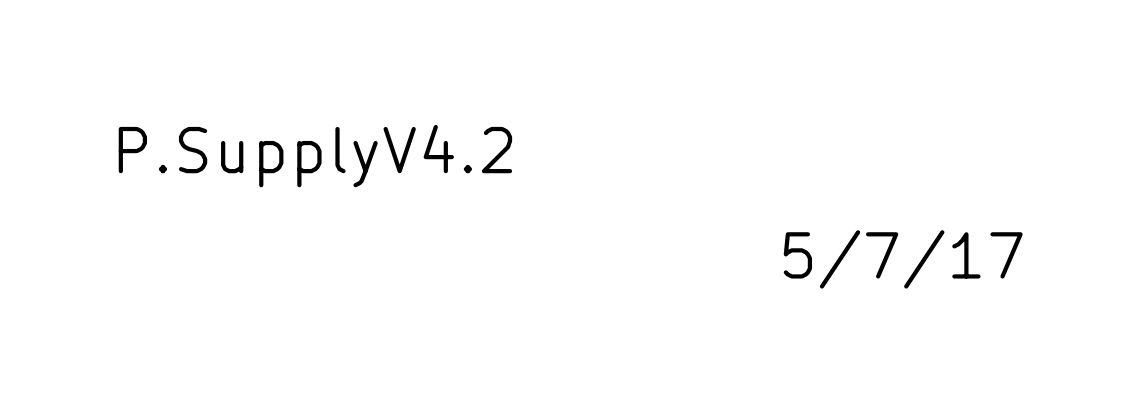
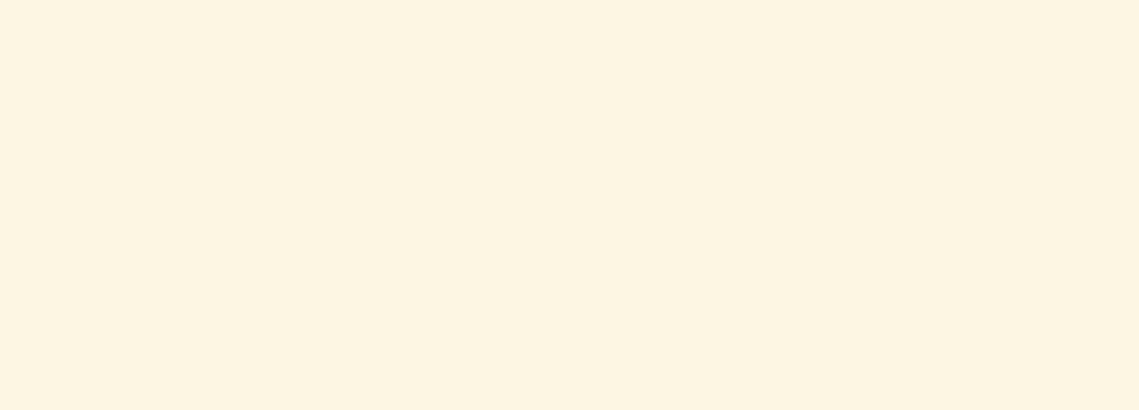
label: P.SupplyV4.2 (315, 156) -> none
label: 5/7/17 (903, 259) -> none

